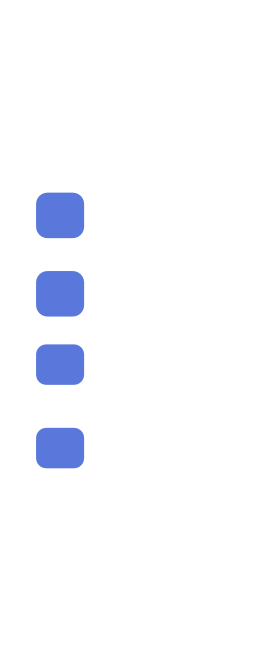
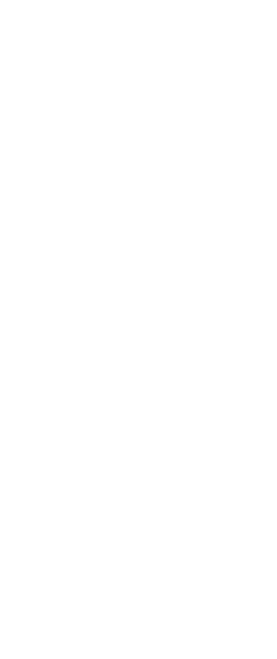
part: (60, 254) -> none
part: (60, 406) -> none

